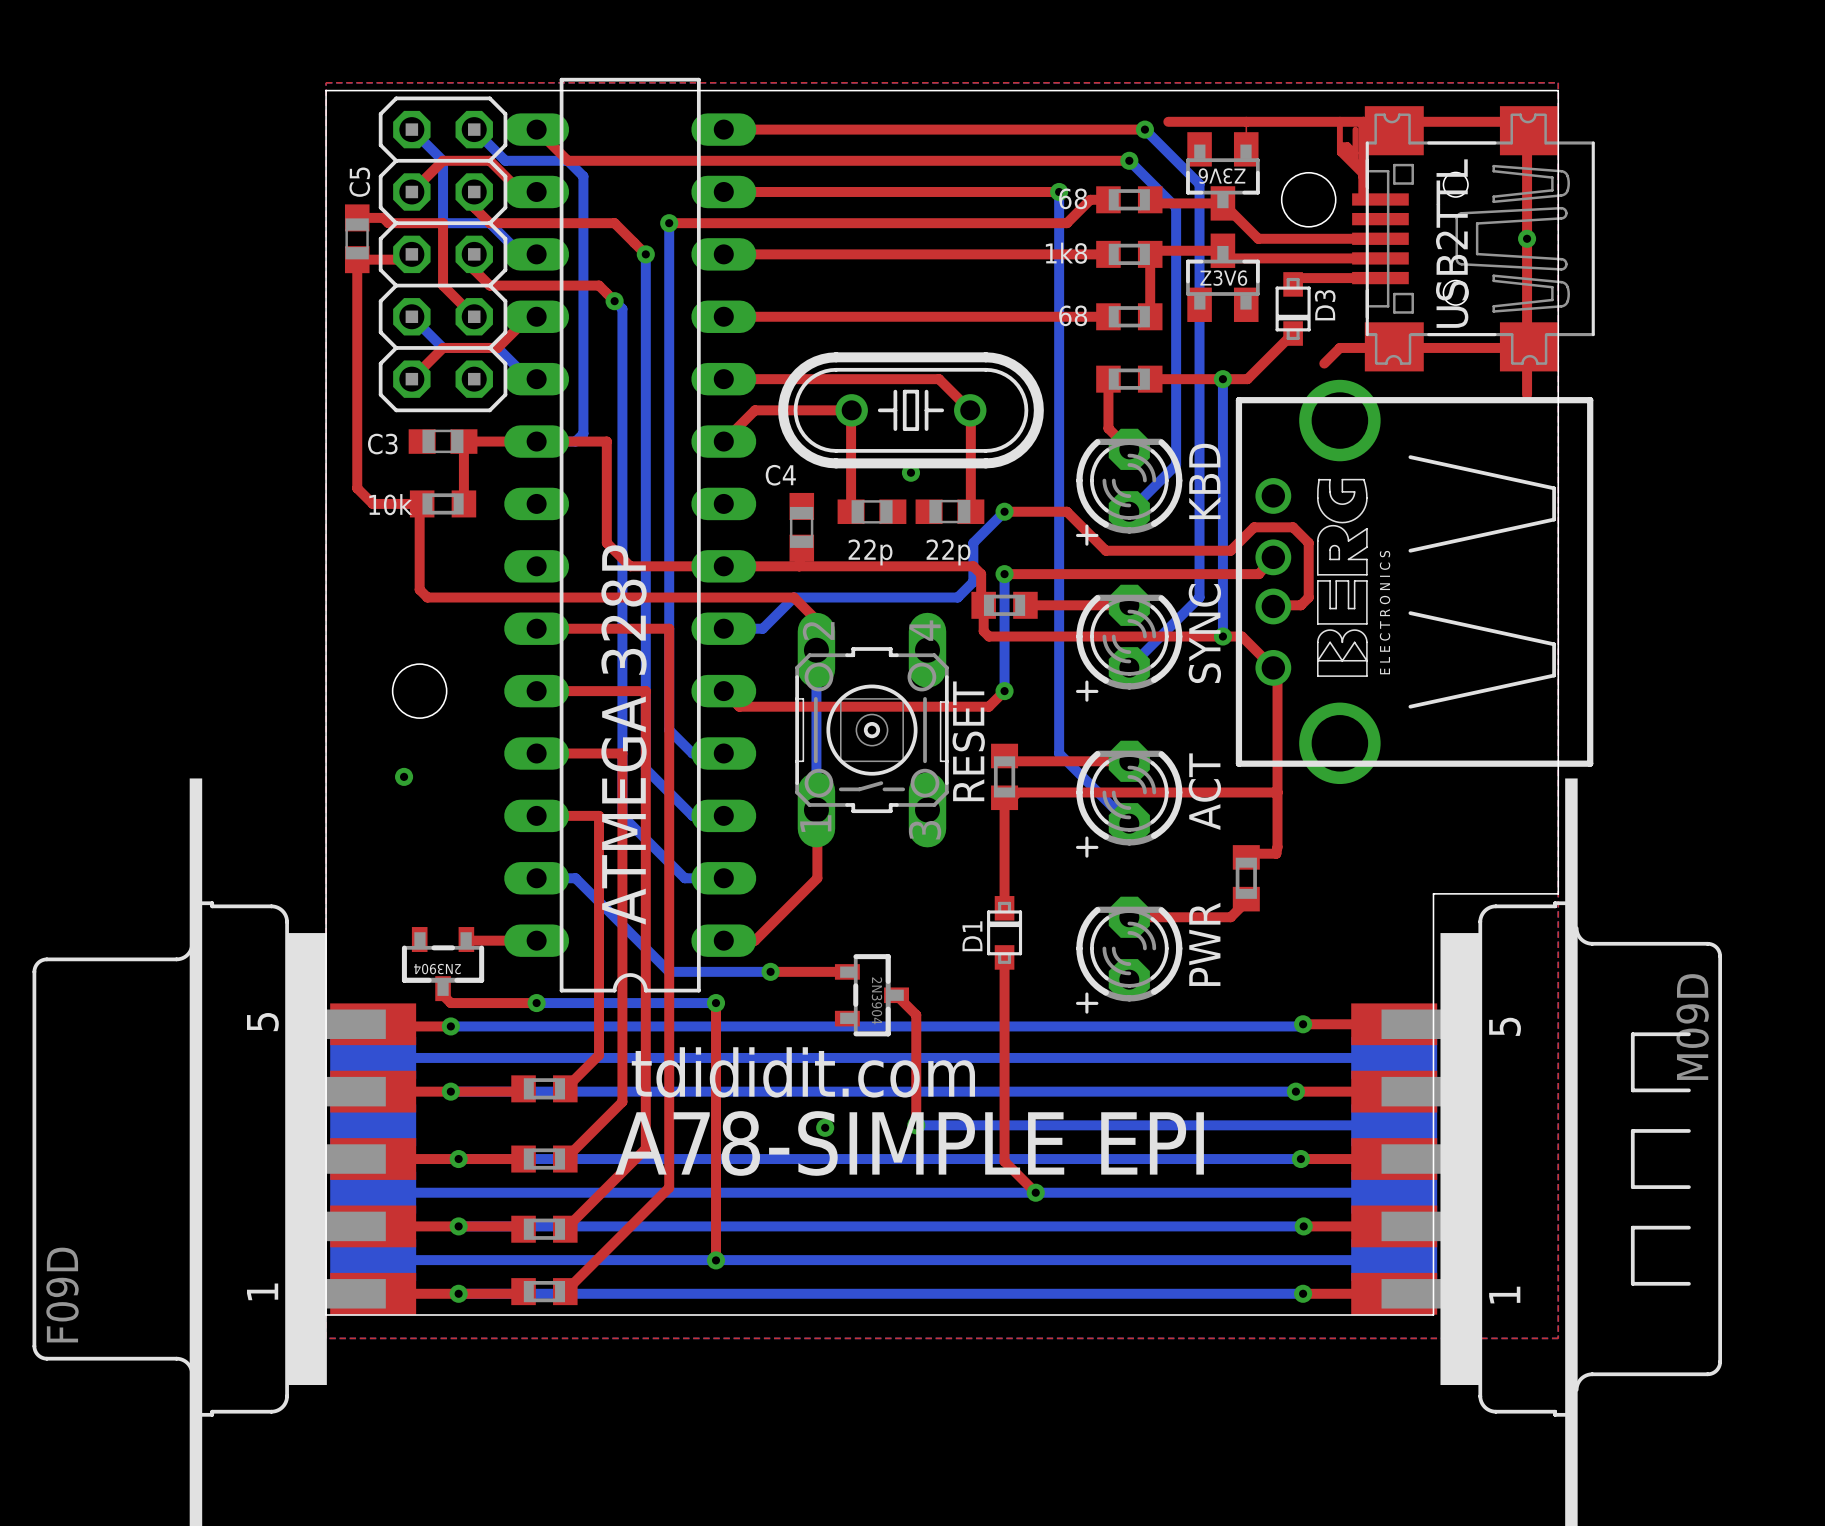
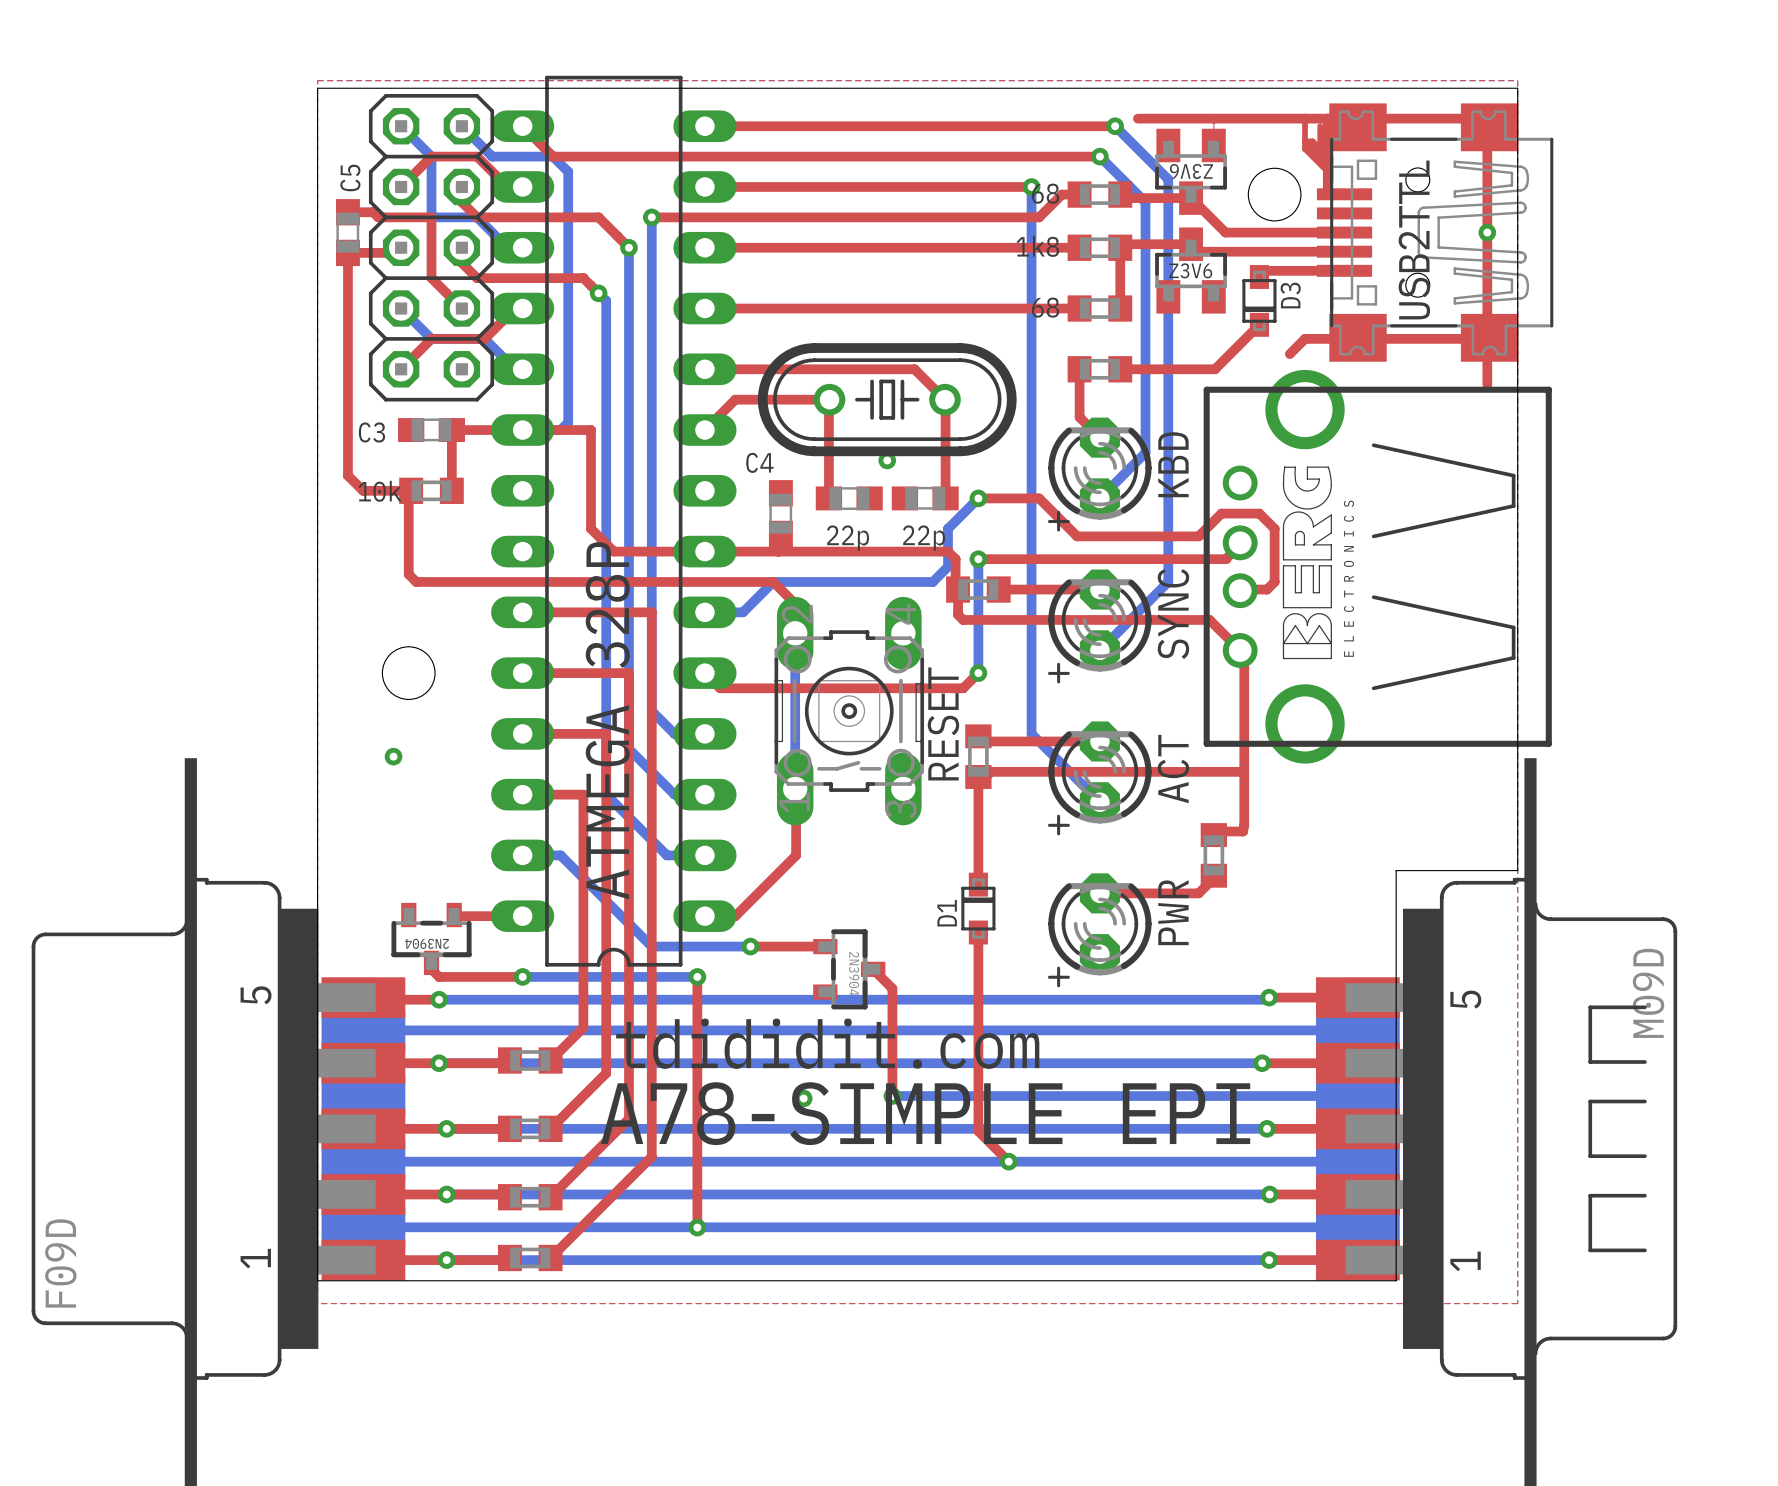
bottom track: (1222, 379) (1222, 636) -> none
via: (1222, 379) -> none
via: (1222, 636) -> none

